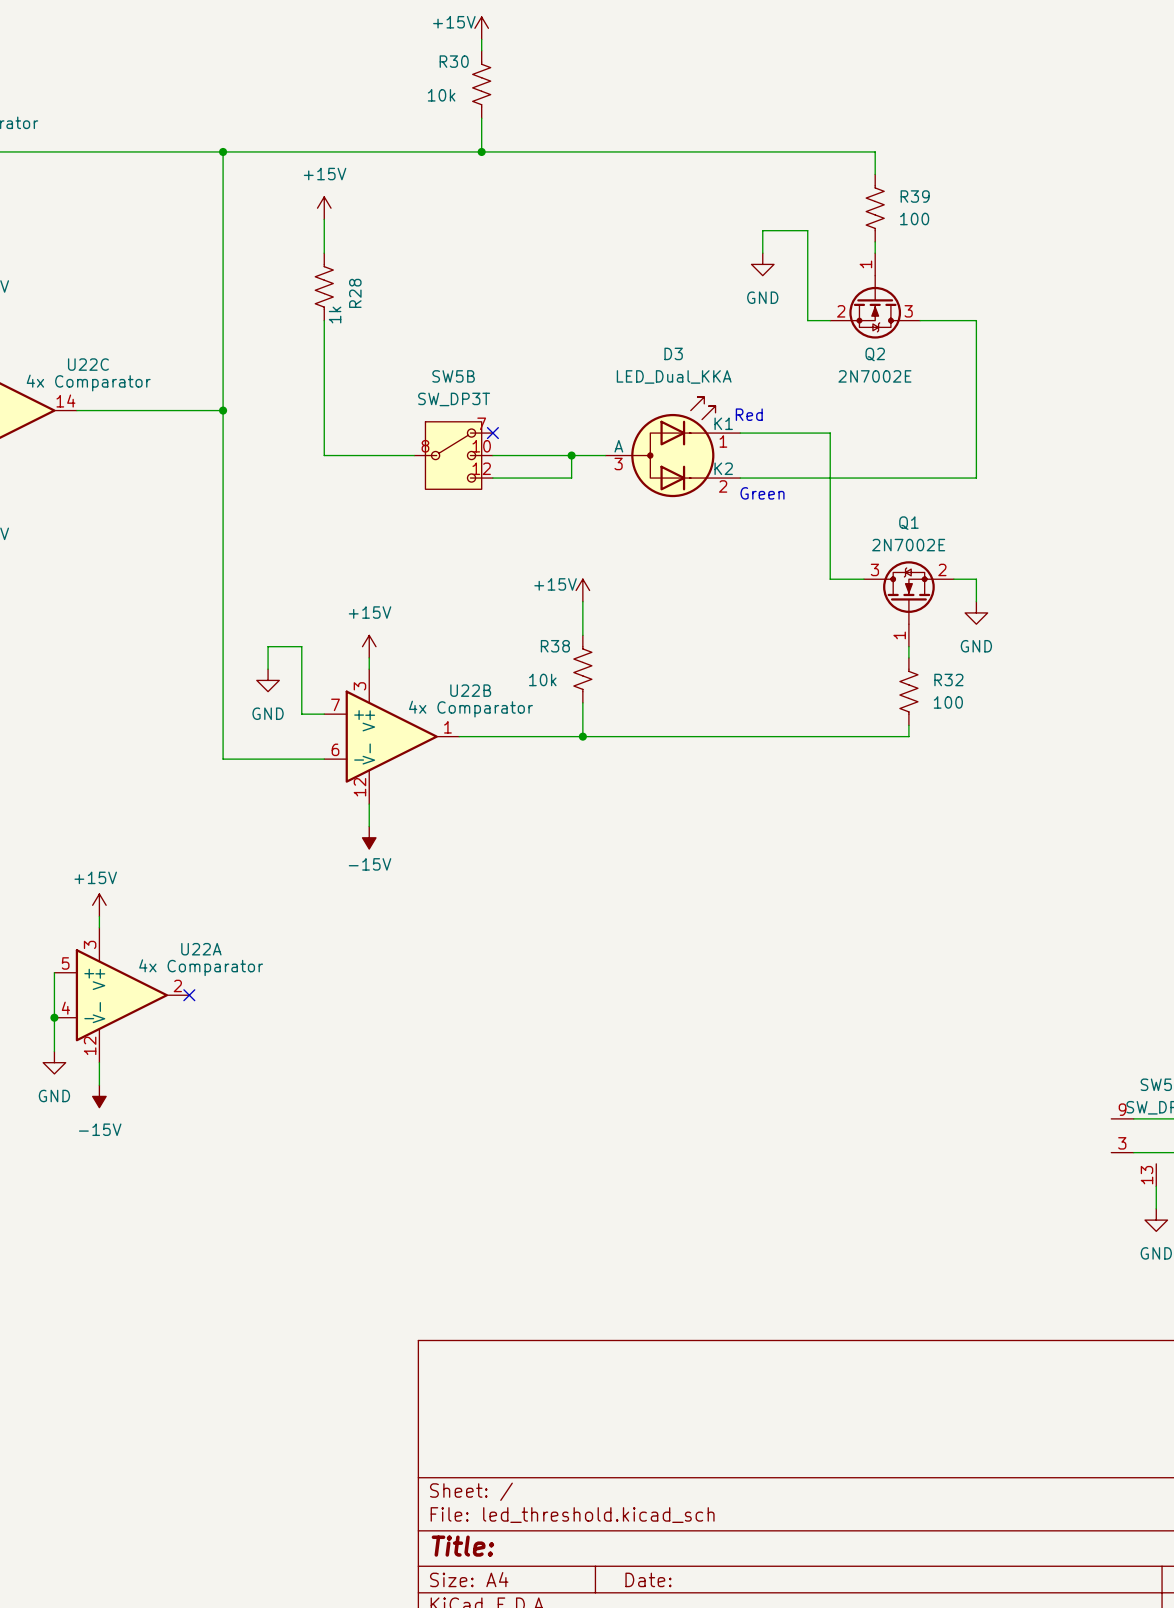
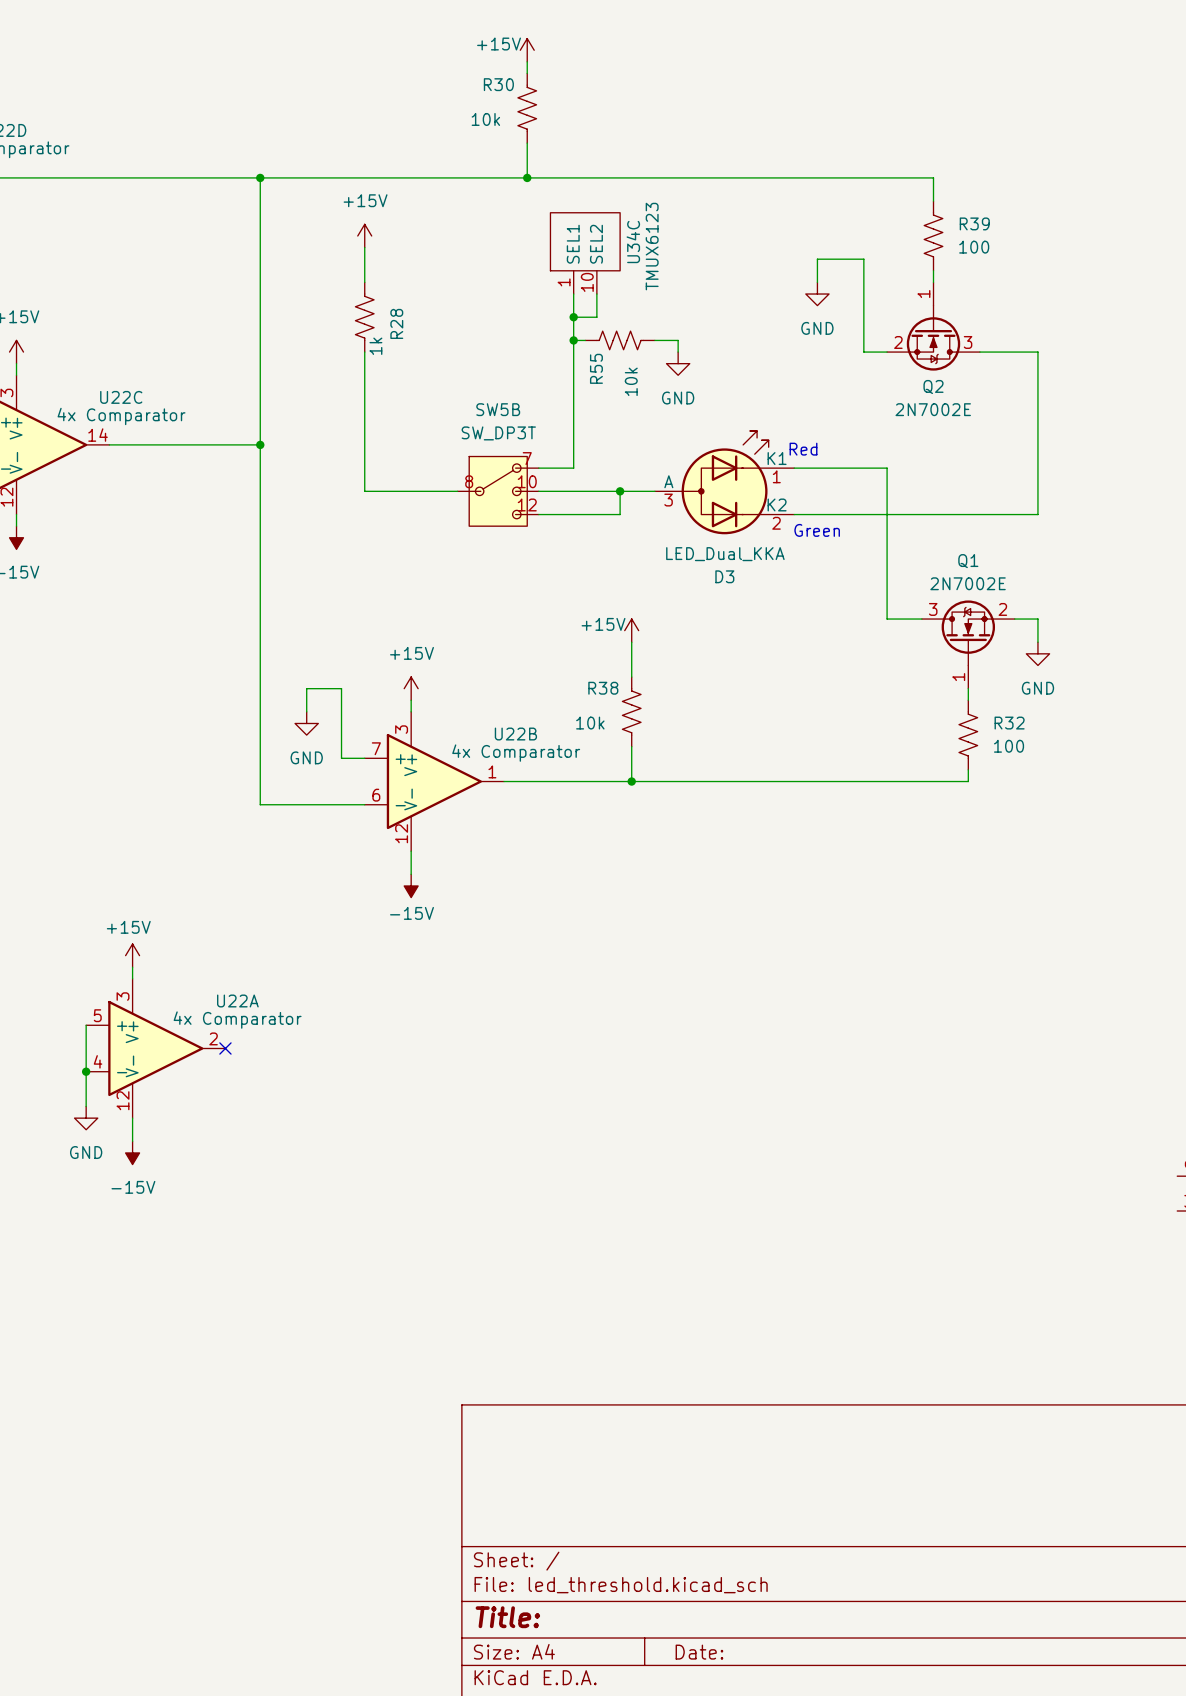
U34C: none -> TMUX6123 (585, 253)
wire: none -> (573, 294) (573, 468) (538, 468)
wire: none -> (596, 294) (596, 317) (573, 317)
junction: none -> (573, 317)
wire: none -> (573, 340) (585, 340)
junction: none -> (573, 340)
R55: none -> 10k (620, 340)
wire: none -> (654, 340) (678, 340) (678, 352)
power symbol: none -> GND (678, 363)
D3 name position: D3 (673, 353) -> D3 (724, 576)
D3 value position: LED_Dual_KKA (674, 376) -> LED_Dual_KKA (725, 554)
no-connect mark: (492, 433) -> none

